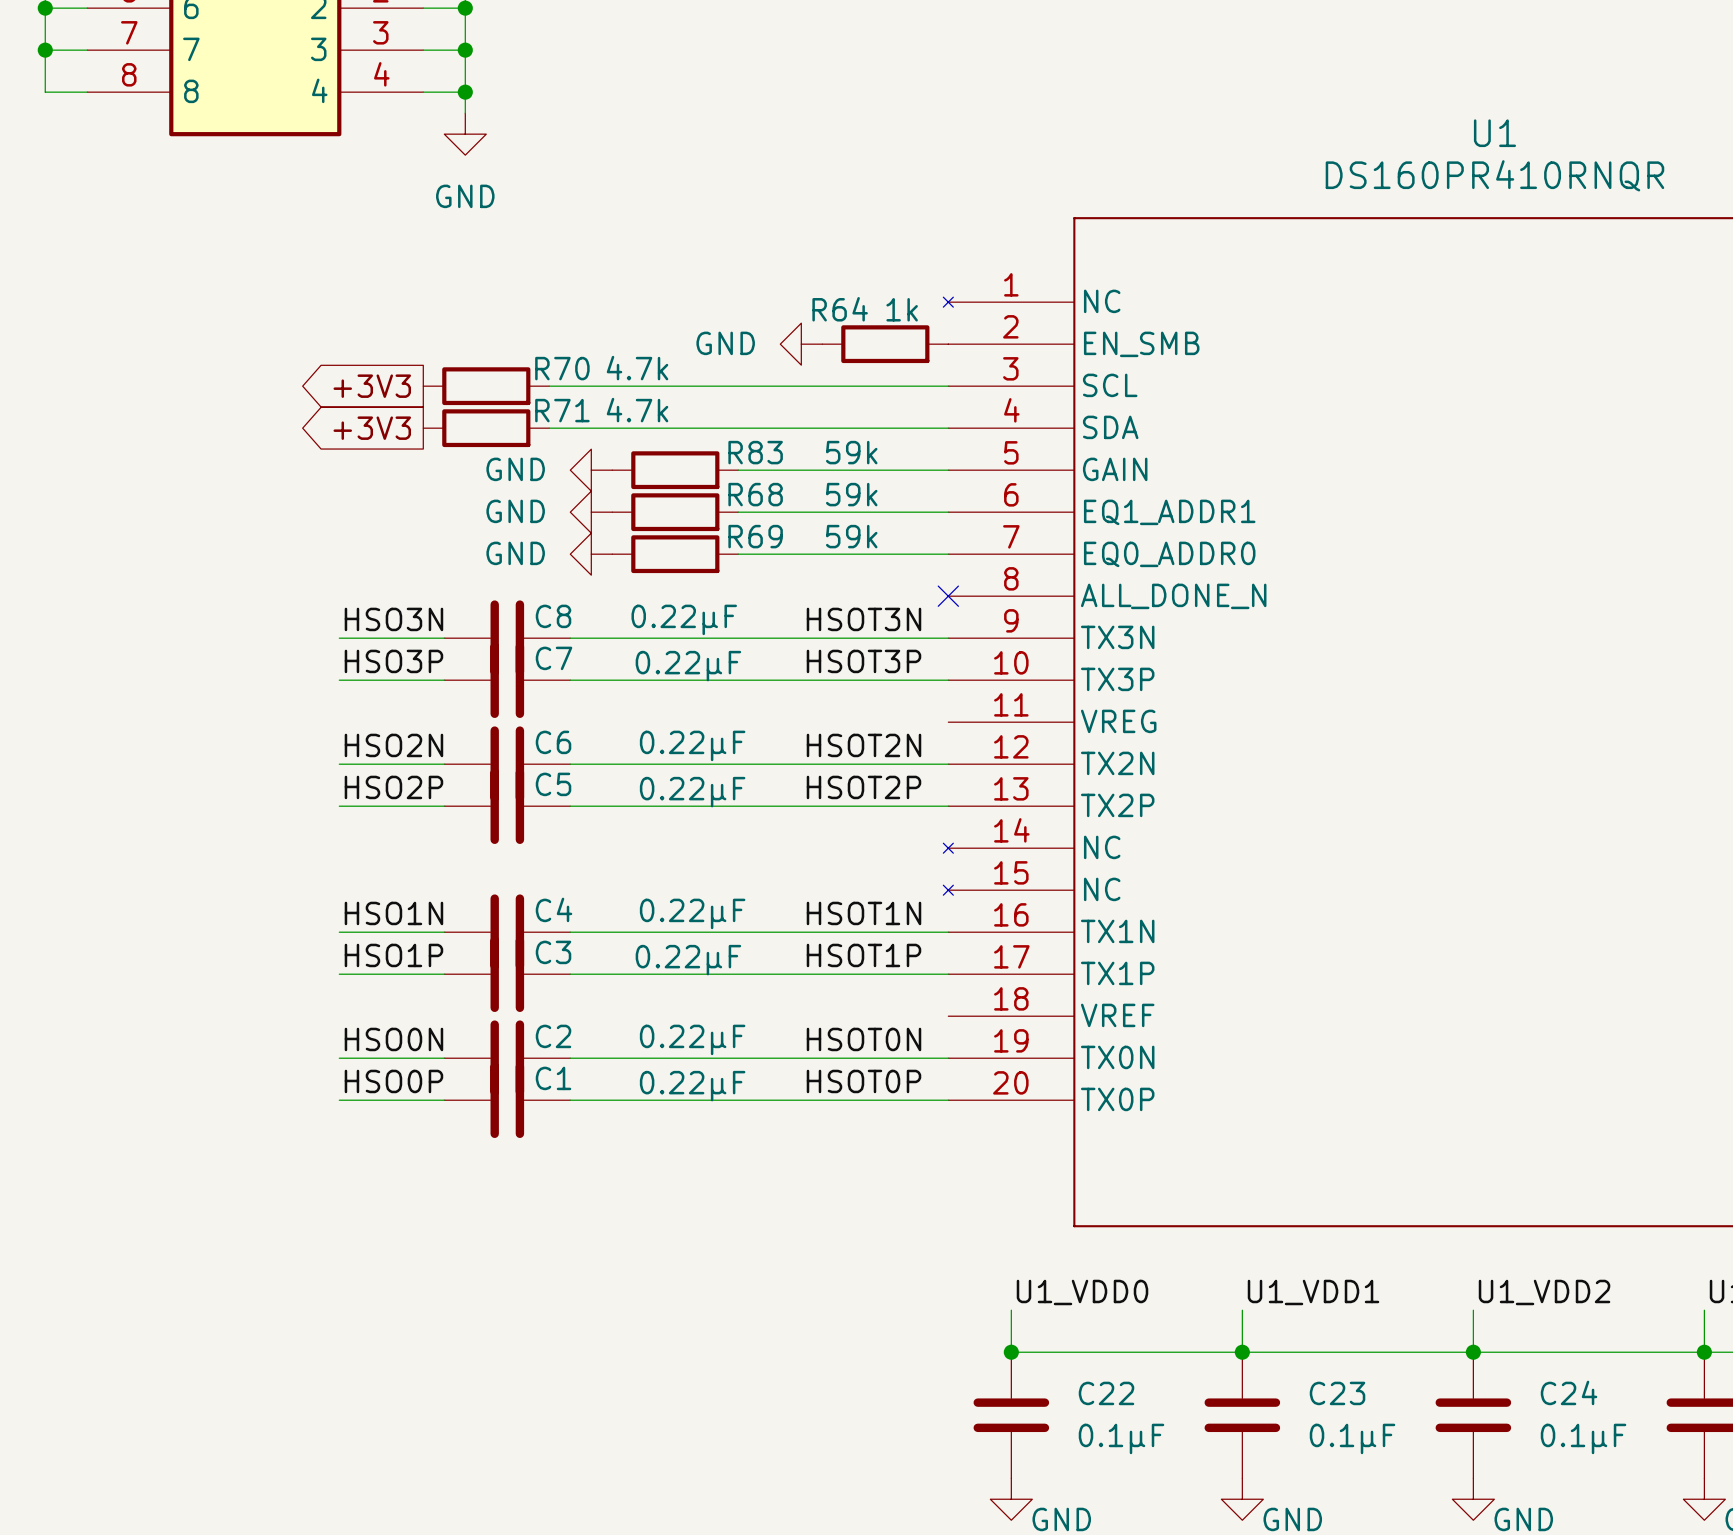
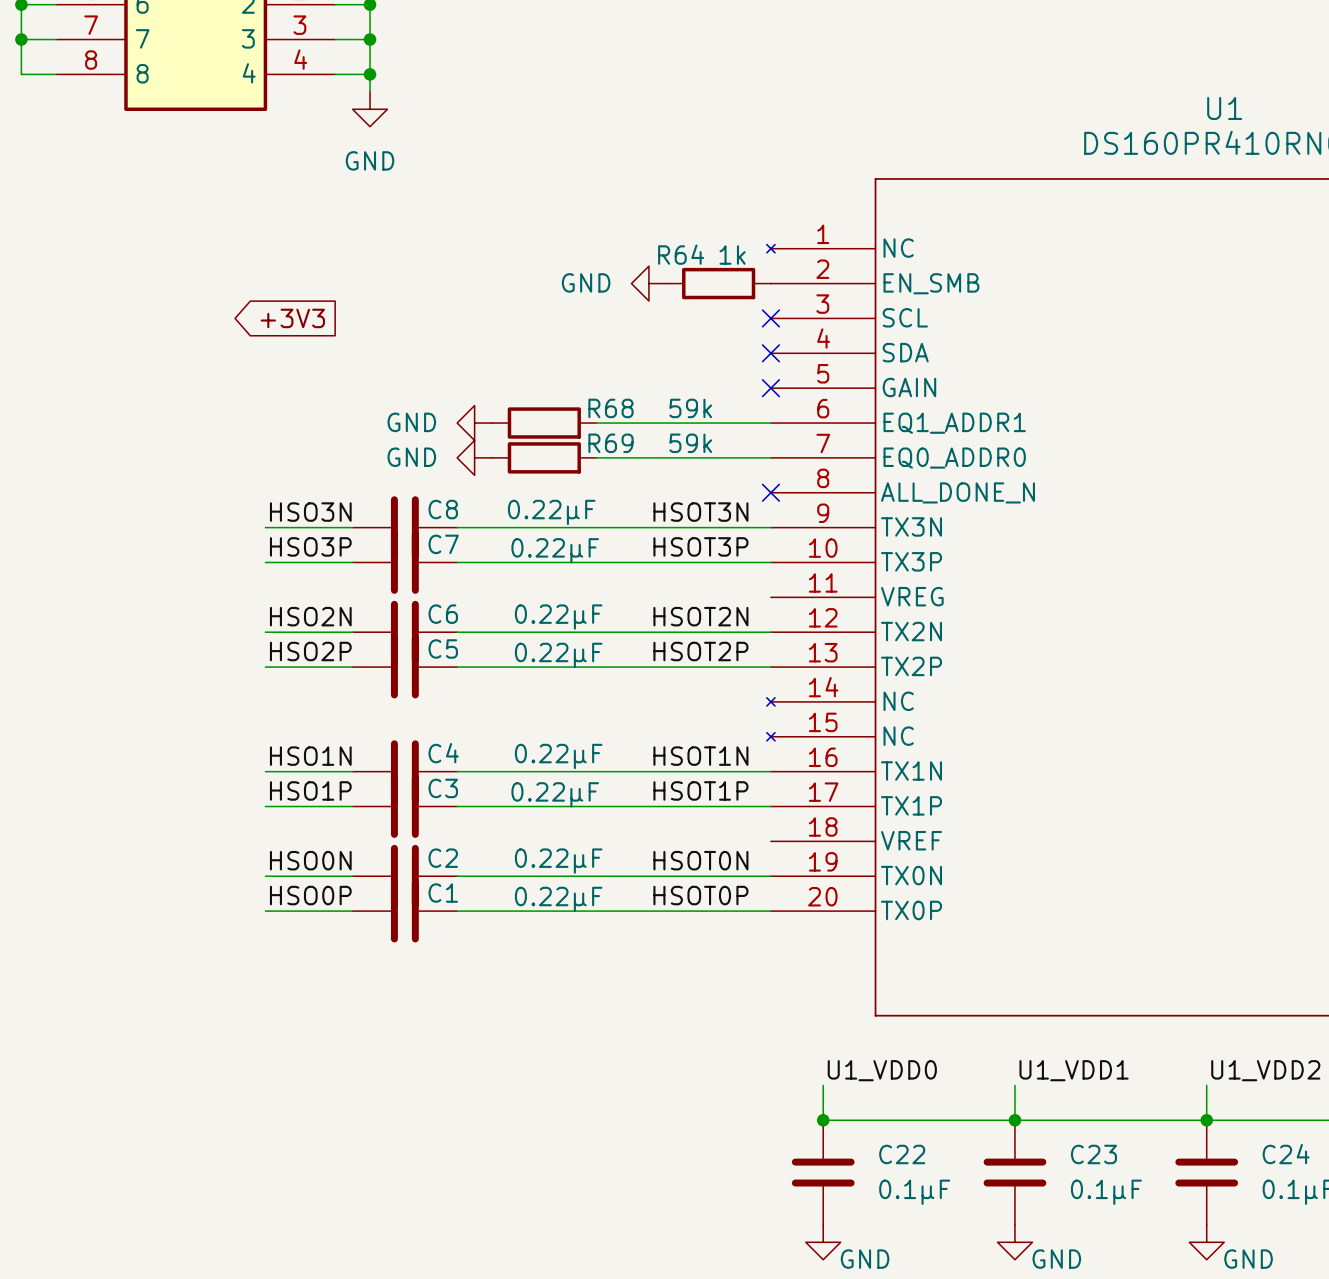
R70: 4.7k (486, 386) -> none
wire: (549, 386) (948, 386) -> none
no-connect mark: none -> (770, 318)
global label: +3V3 (372, 428) -> none
R71: 4.7k (486, 428) -> none
wire: (549, 428) (948, 428) -> none
no-connect mark: none -> (770, 353)
power symbol: GND (591, 470) -> none
R83: 59k (675, 470) -> none
wire: (738, 470) (948, 470) -> none
no-connect mark: none -> (770, 388)

